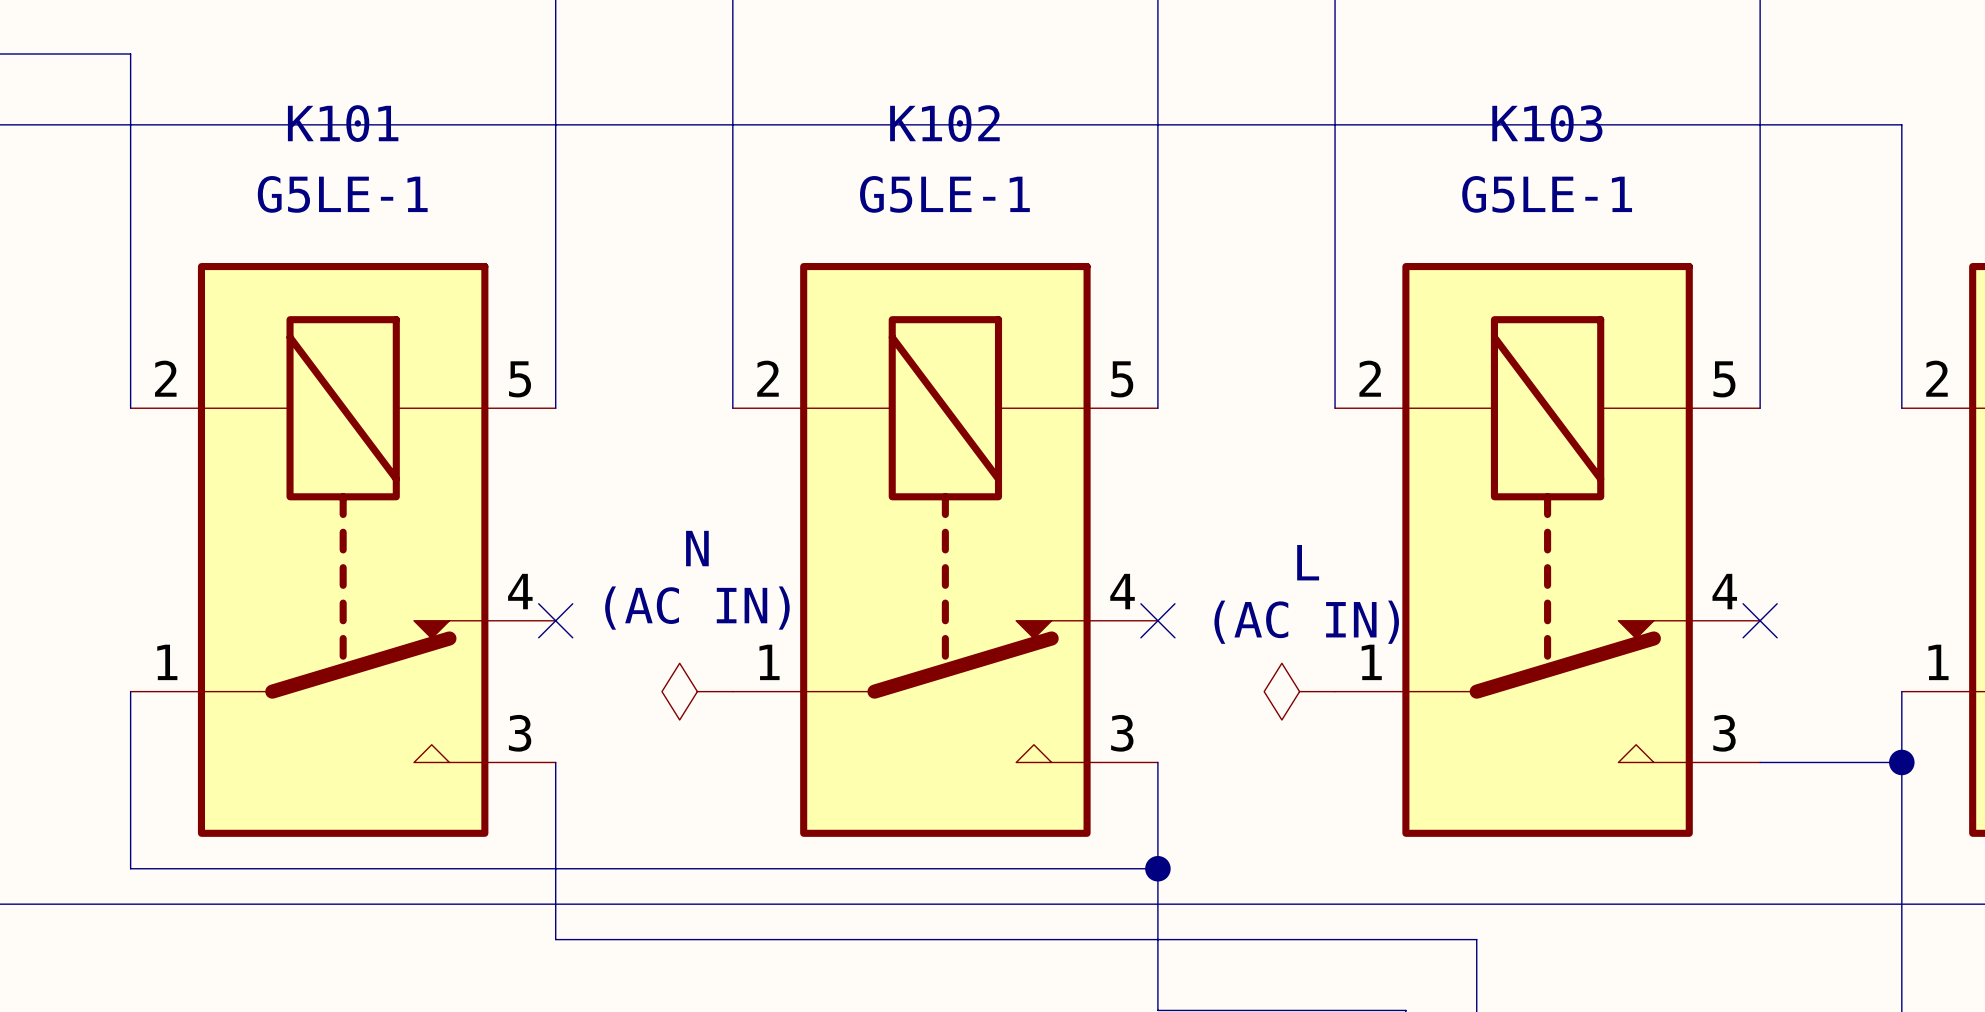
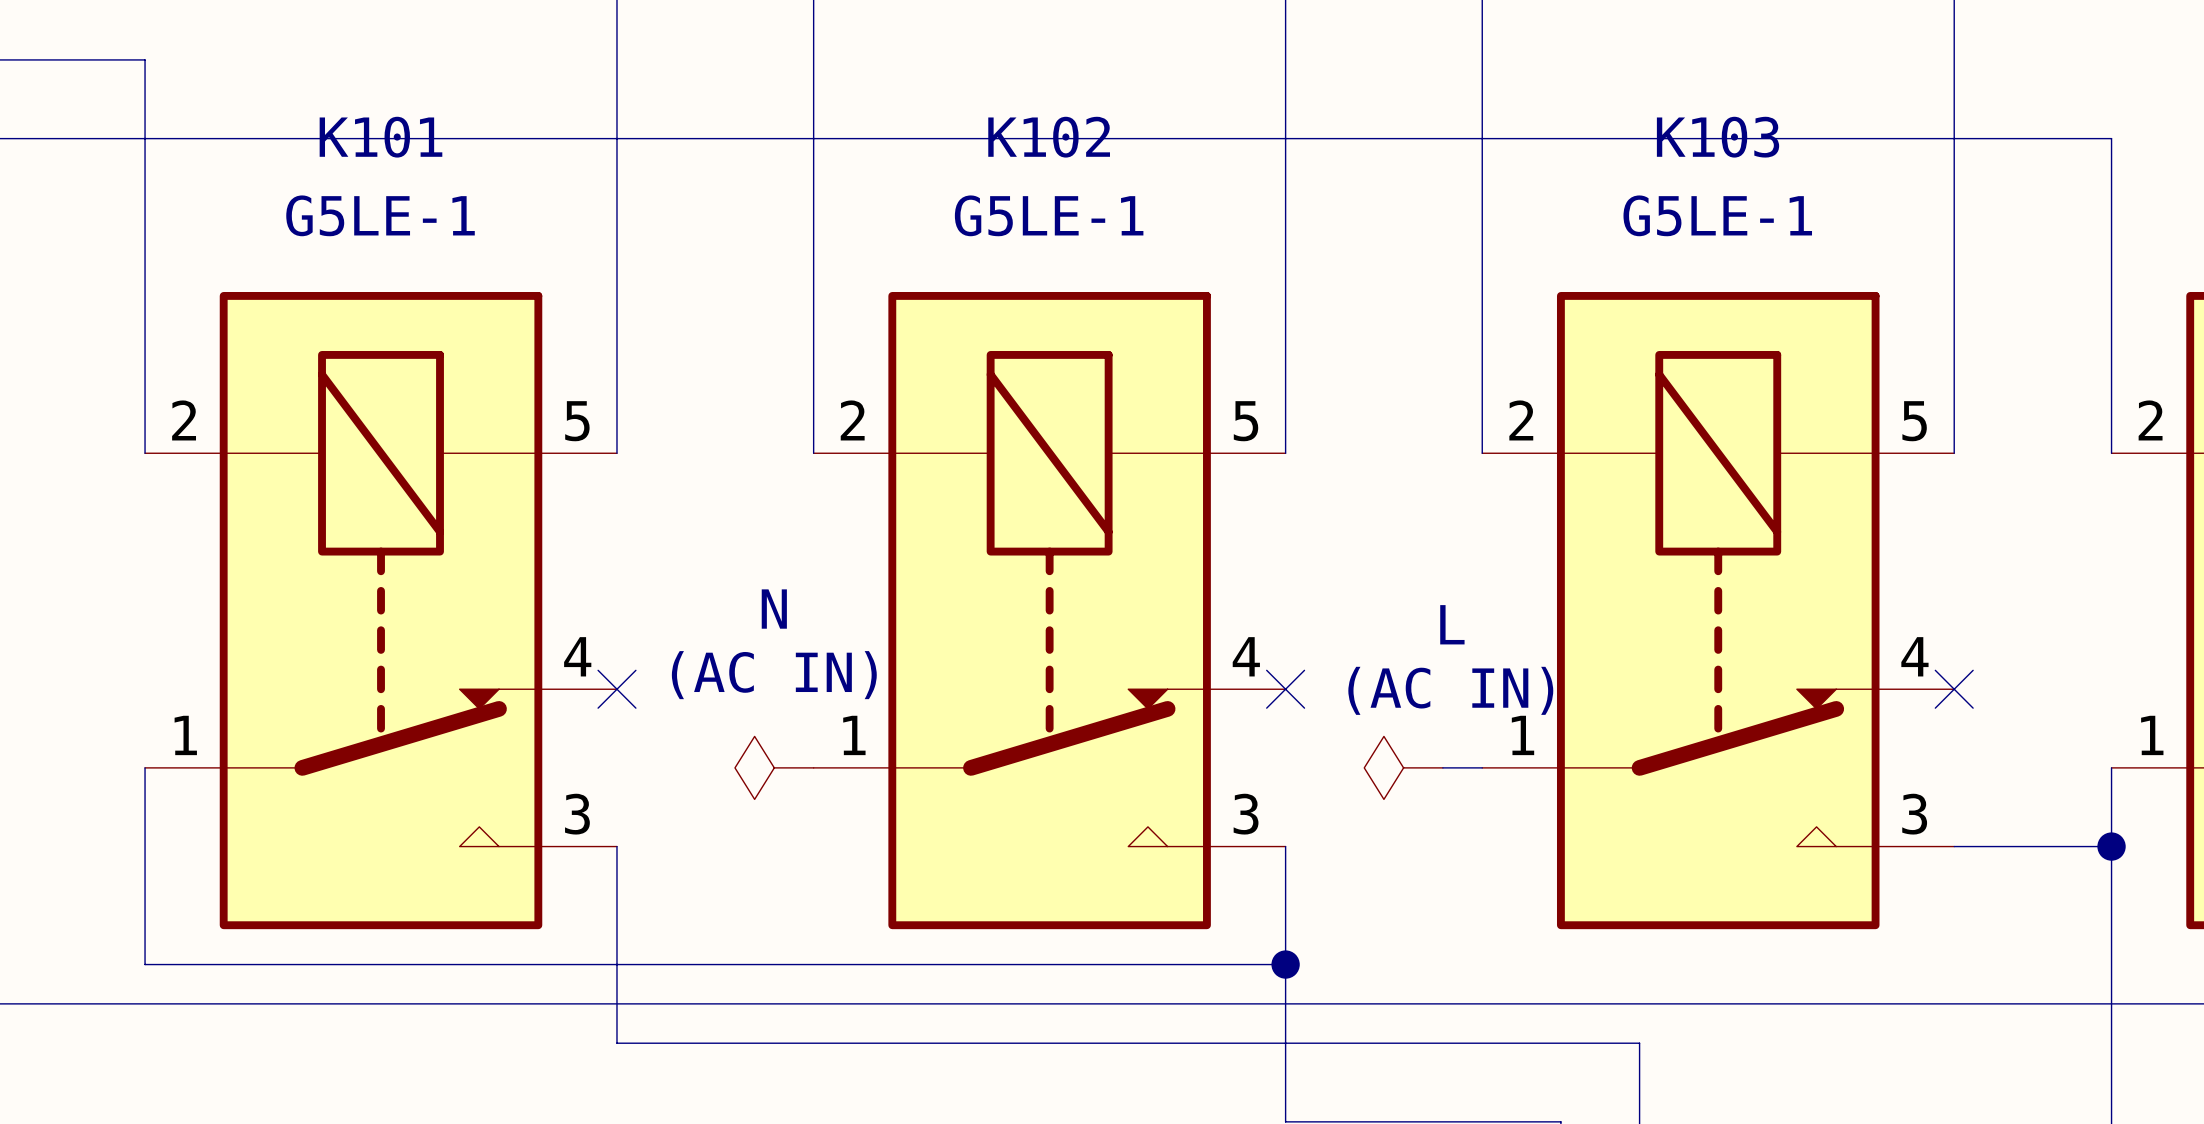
power symbol position: (1299, 691) -> (1403, 767)

